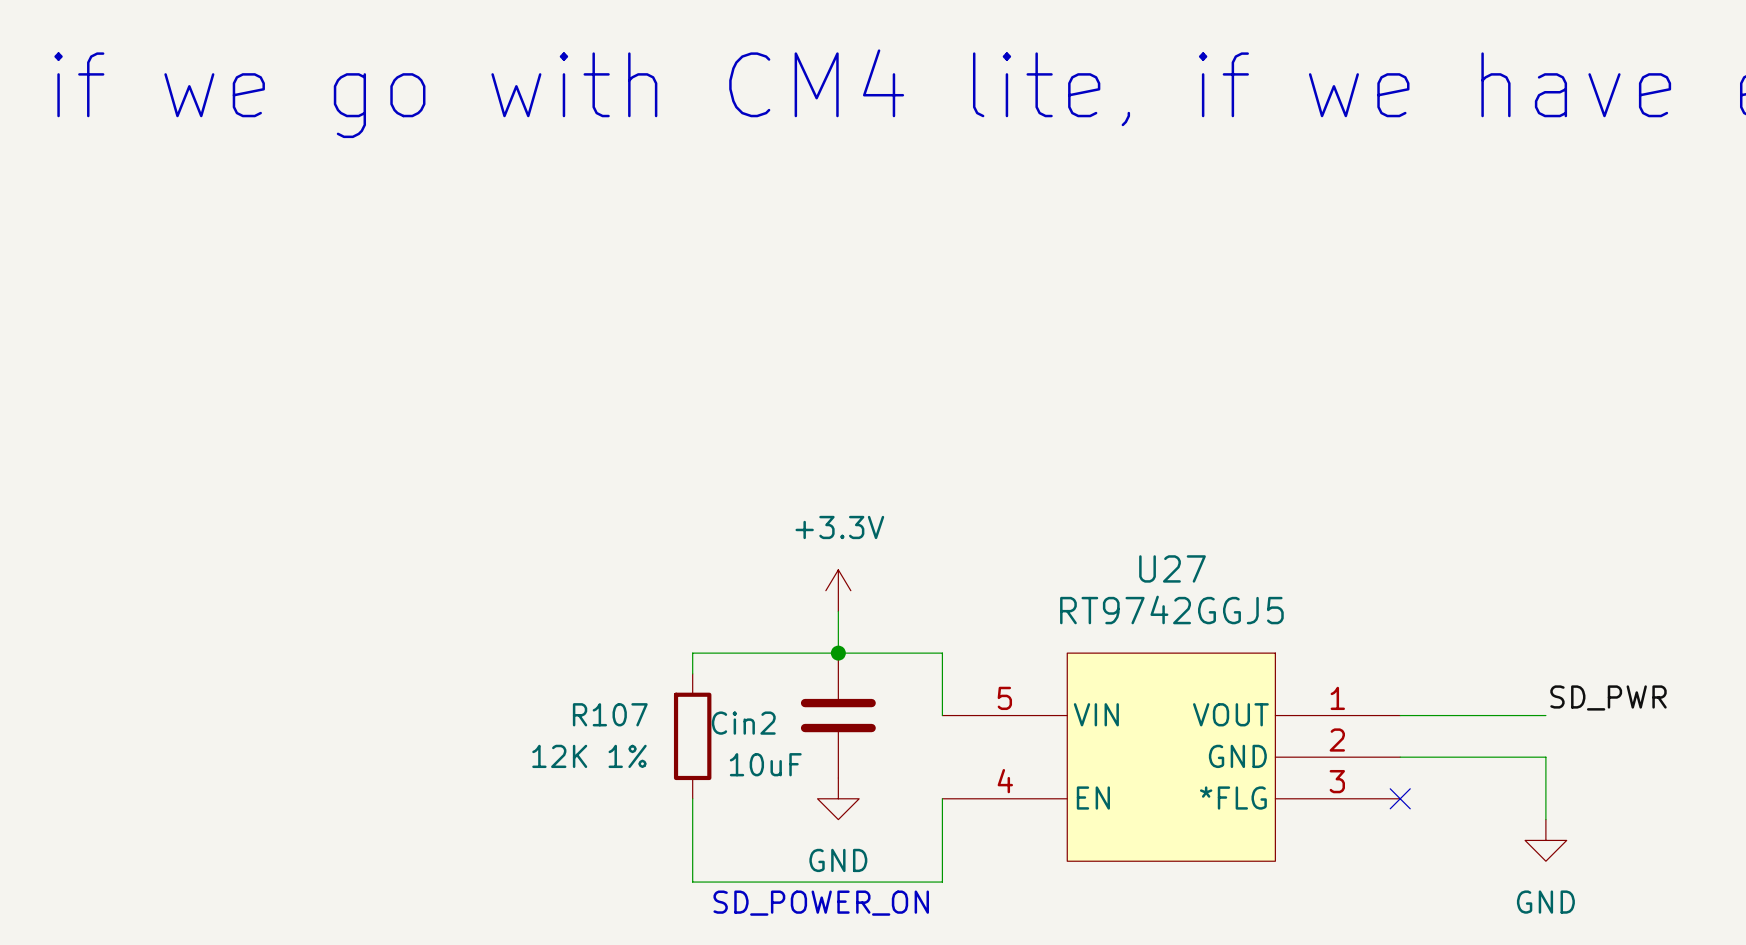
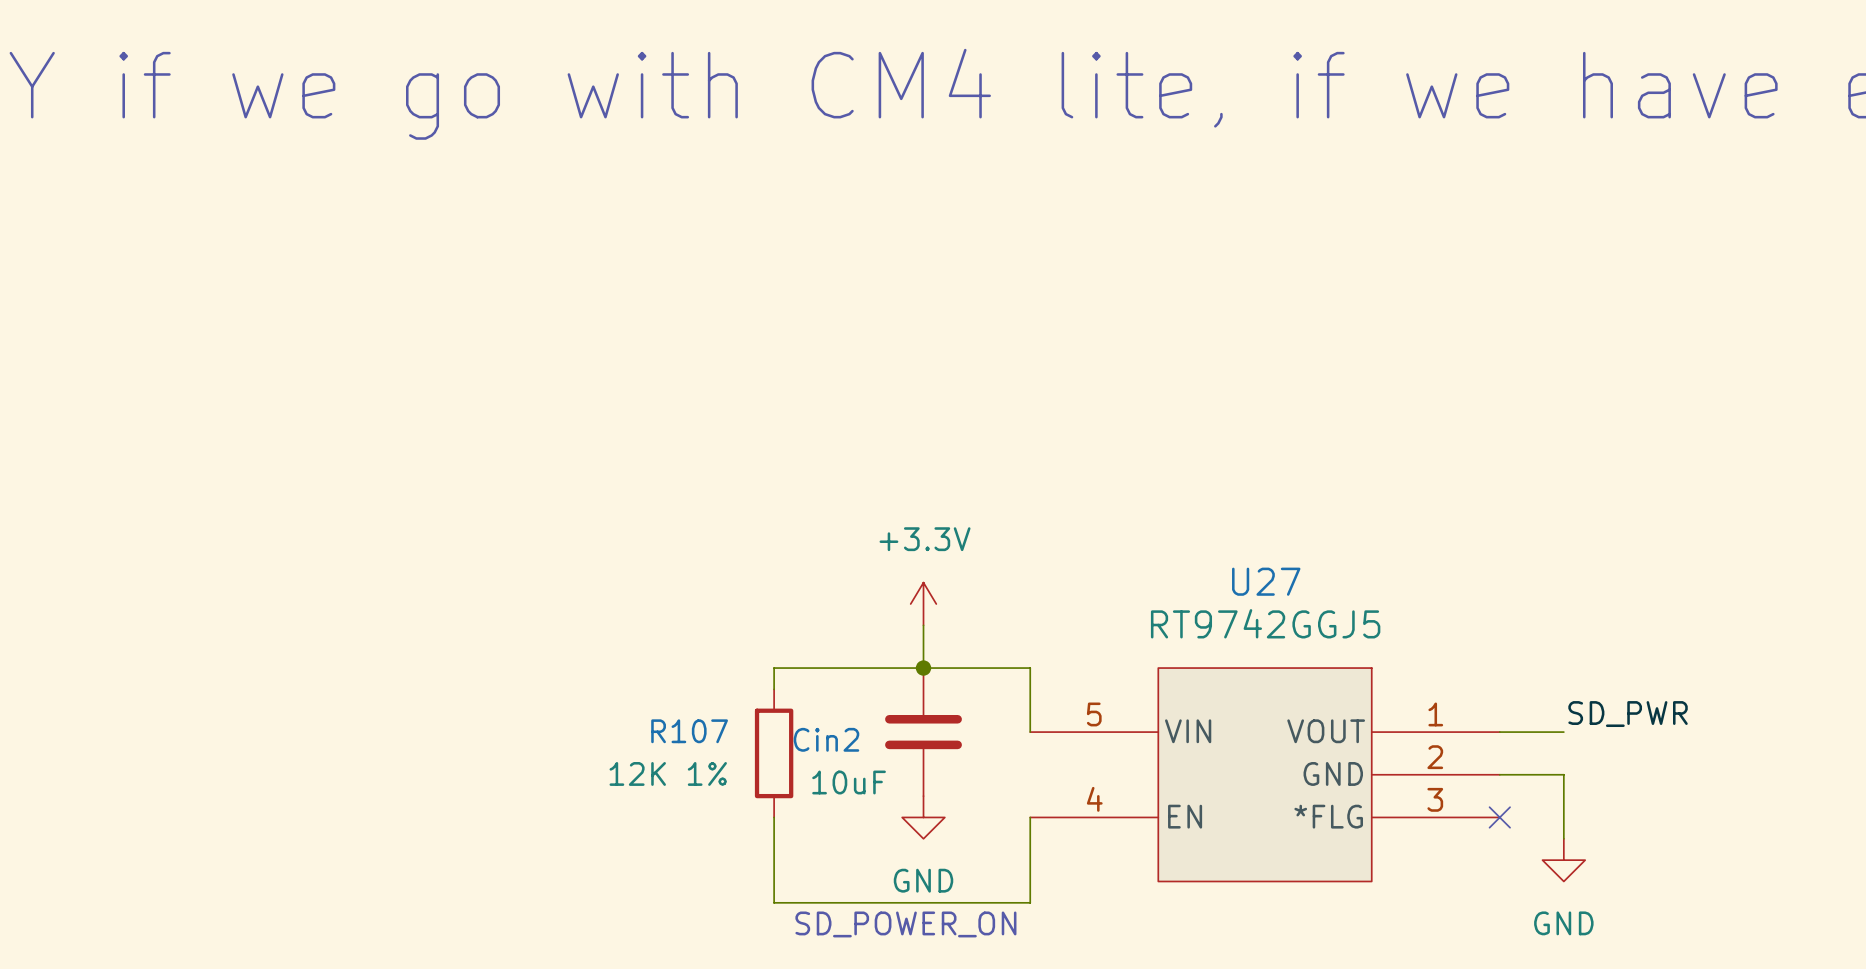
label position: SD_PWR (1608, 697) -> SD_PWR (1628, 714)
wire: (1462, 715) (1545, 715) -> none
wire: (1462, 757) (1545, 757) (1545, 819) -> (1563, 774) (1563, 838)
power symbol position: GND (1545, 840) -> GND (1563, 860)

